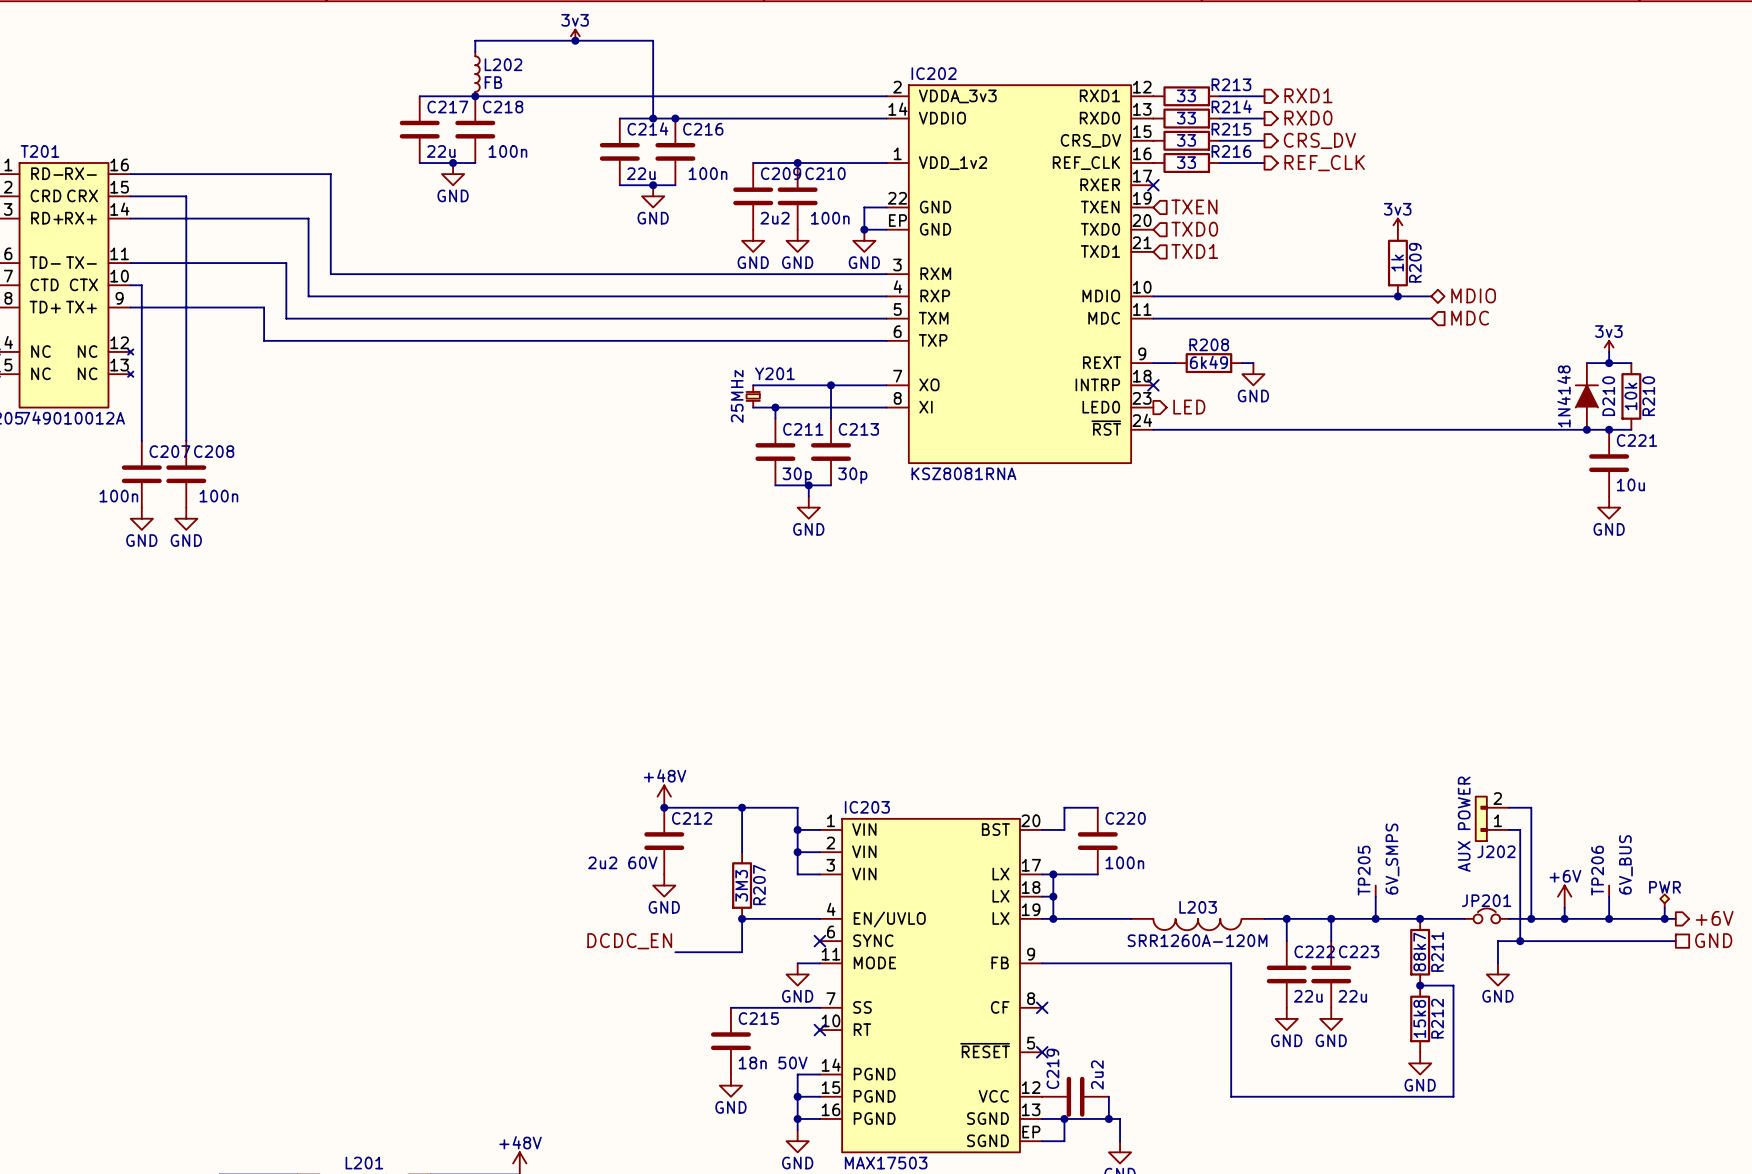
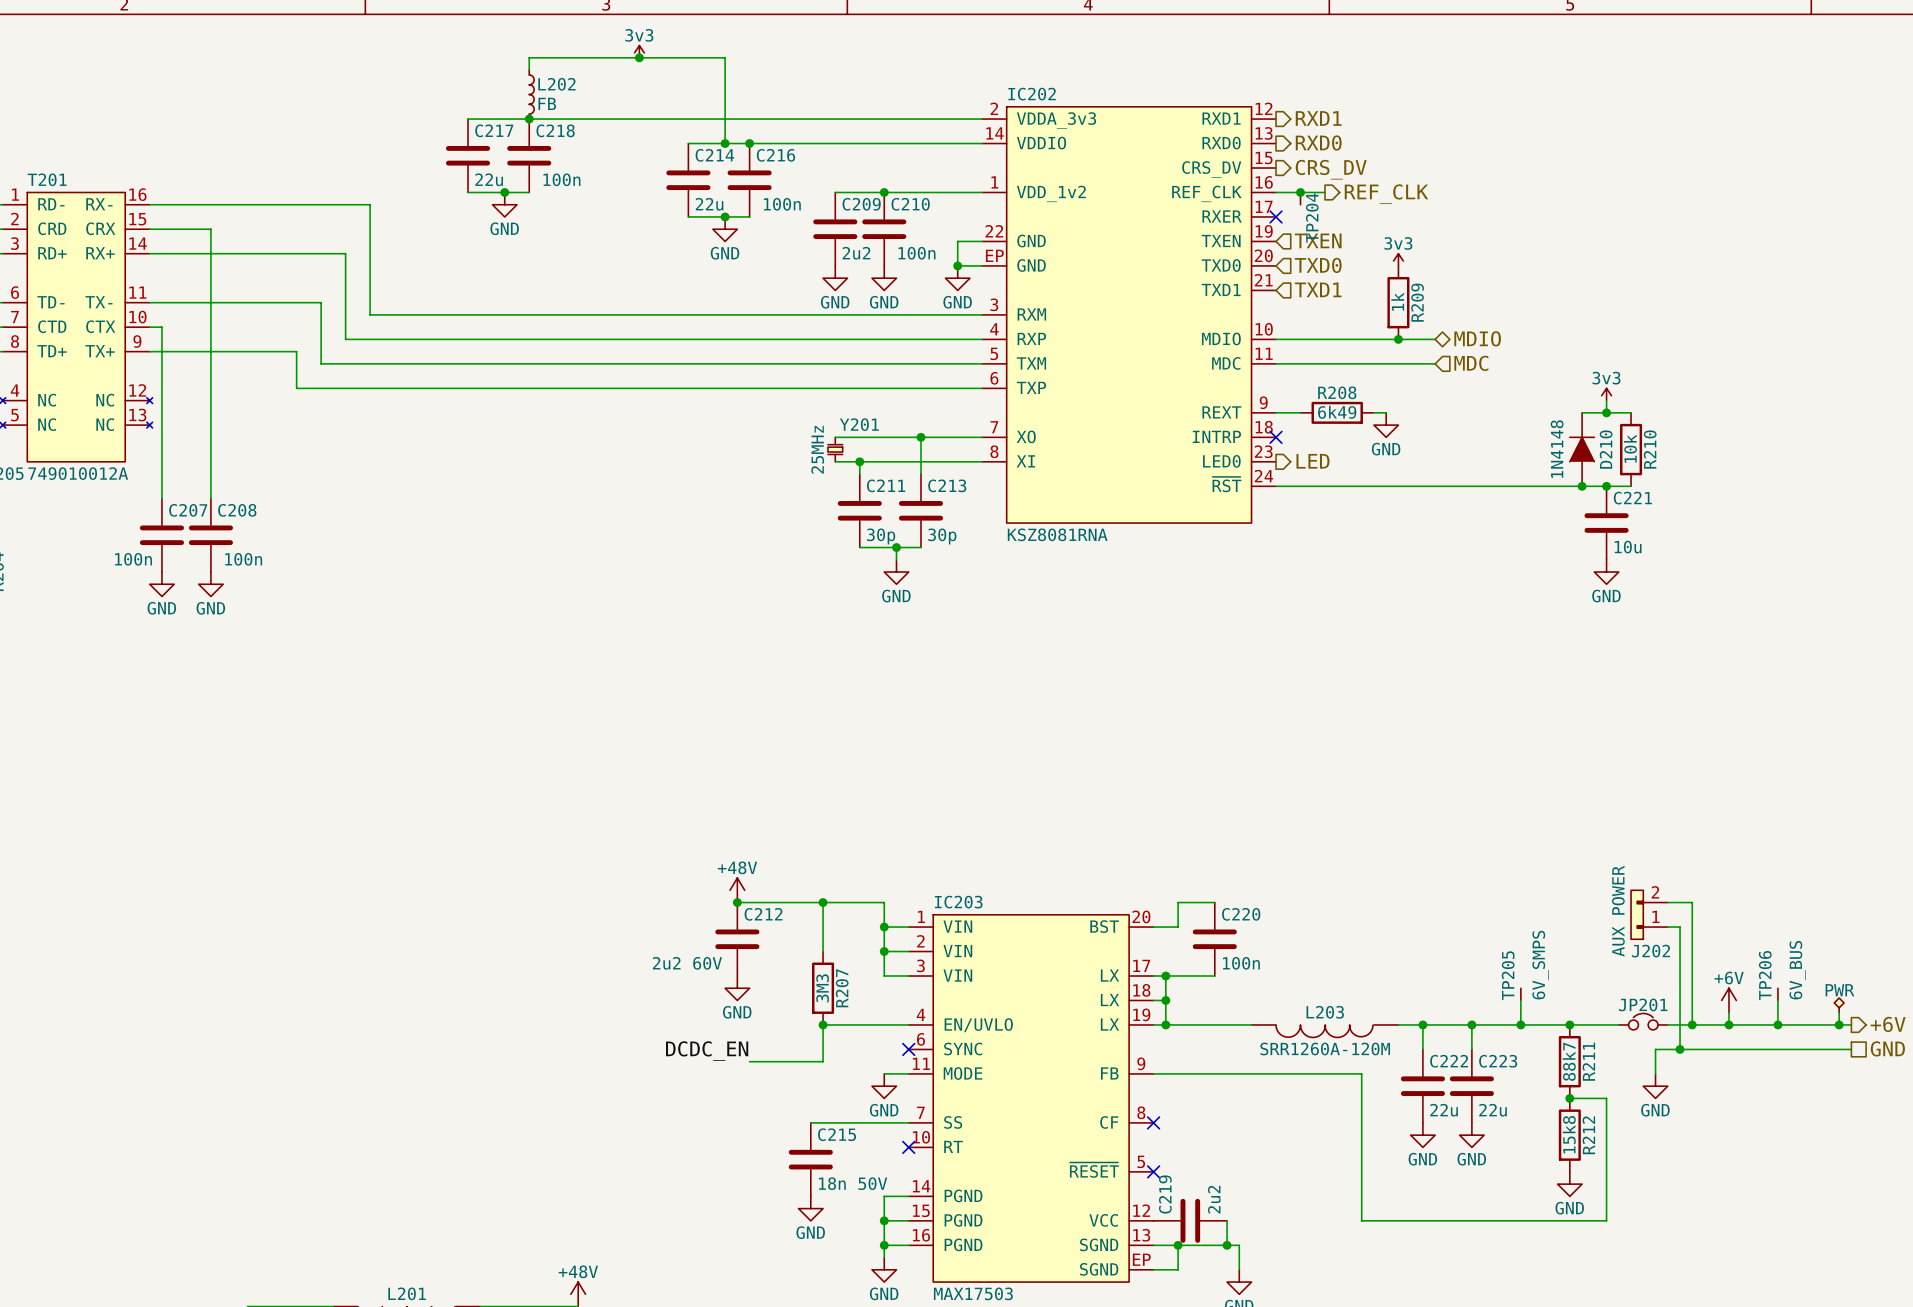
hierarchical label position: RXD1 (1308, 95) -> RXD1 (1318, 118)
R213: 33 (1186, 96) -> none
wire: (1220, 96) (1264, 96) -> none
R214: 33 (1186, 118) -> none
wire: (1220, 118) (1264, 118) -> none
hierarchical label position: RXD0 (1308, 118) -> RXD0 (1318, 142)
R215: 33 (1186, 140) -> none
wire: (1220, 140) (1264, 140) -> none
hierarchical label position: CRS_DV (1319, 140) -> CRS_DV (1331, 169)
junction: none -> (1300, 192)
R216: 33 (1186, 163) -> none
wire: (1220, 163) (1264, 163) -> (1276, 192) (1324, 192)
hierarchical label position: REF_CLK (1324, 163) -> REF_CLK (1386, 194)
TP204: none -> (1300, 201)
power symbol: none -> 3v3 (1398, 259)
power symbol: 3v3 (1397, 224) -> none
R209 position: (1397, 263) -> (1398, 302)
hierarchical label position: MDIO (1473, 295) -> MDIO (1477, 338)
junction: none -> (1398, 339)
wire: (1297, 296) (1431, 296) -> none
junction: (1397, 296) -> none
wire: (1297, 318) (1431, 318) -> none
hierarchical label position: MDC (1470, 318) -> MDC (1471, 363)
power symbol: none -> 3v3 (1606, 394)
power symbol: 3v3 (1609, 346) -> none
wire: (1609, 351) (1609, 363) -> (1606, 400) (1606, 412)
junction: none -> (1606, 412)
wire: (1586, 363) (1631, 363) -> (1582, 412) (1631, 412)
junction: (1609, 363) -> none
D210 position: (1586, 396) -> (1582, 449)
R210 position: (1631, 396) -> (1631, 449)
junction: none -> (1582, 486)
junction: none -> (1606, 486)
wire: (1475, 429) (1631, 429) -> none
junction: (1586, 429) -> none
junction: (1609, 429) -> none
C221 position: (1609, 463) -> (1606, 523)
power symbol position: GND (1609, 507) -> GND (1606, 572)

